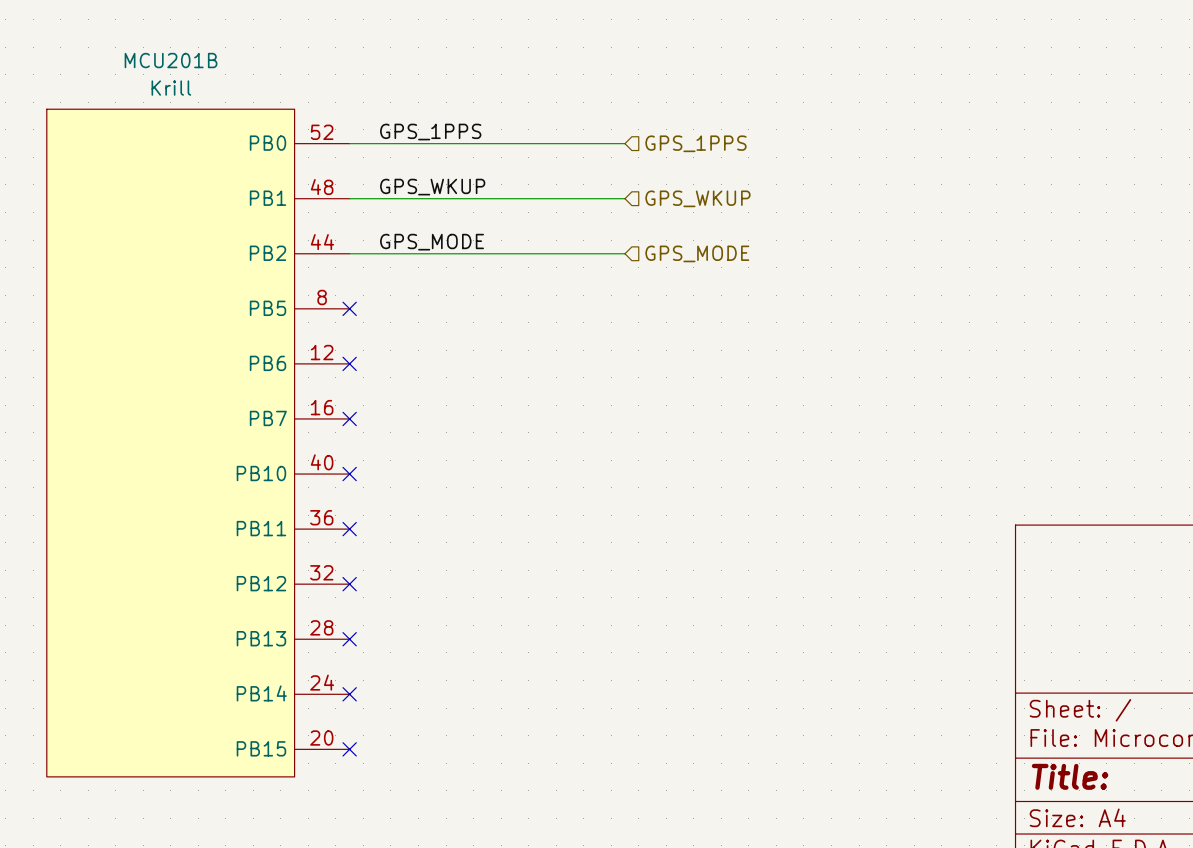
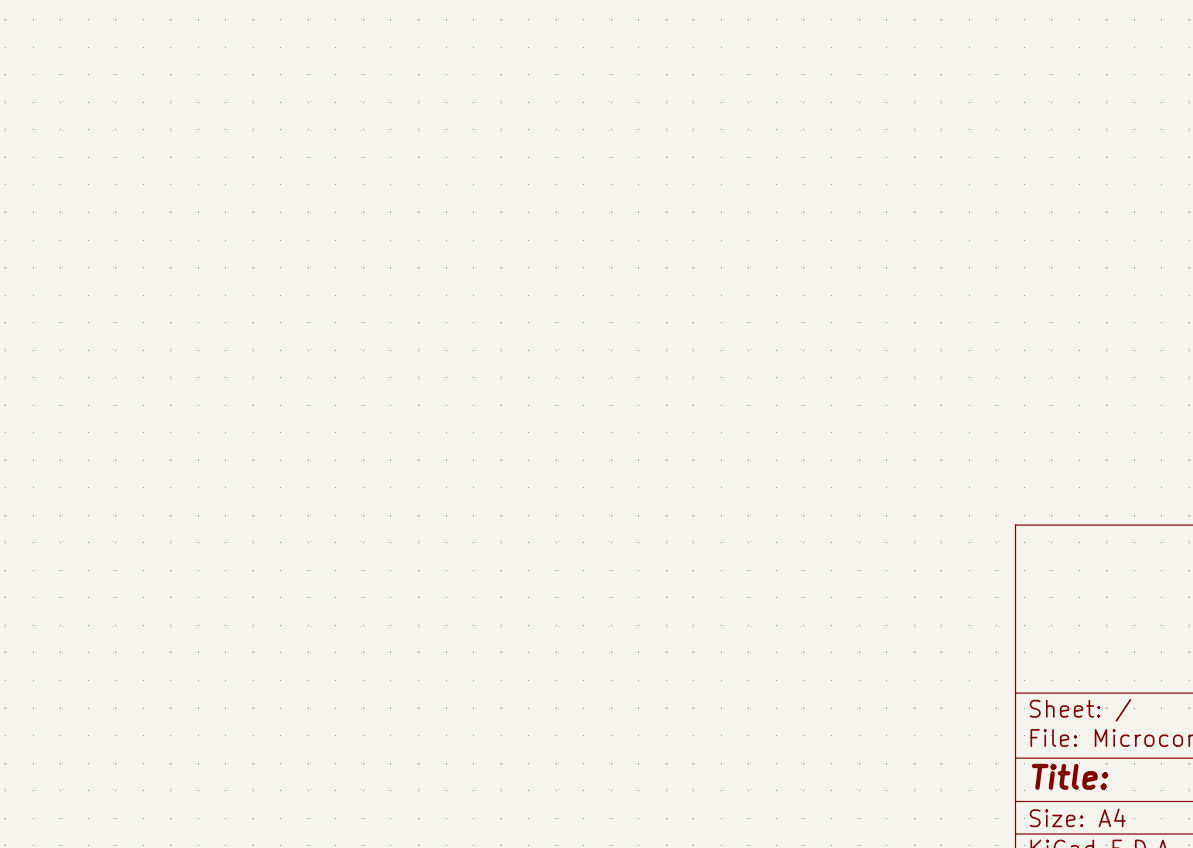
label: GPS_1PPS (430, 132) -> none
wire: (349, 143) (624, 143) -> none
hierarchical label: GPS_1PPS (695, 143) -> none
label: GPS_WKUP (432, 187) -> none
wire: (349, 198) (624, 198) -> none
hierarchical label: GPS_WKUP (697, 198) -> none
label: GPS_MODE (432, 242) -> none
wire: (349, 253) (624, 253) -> none
hierarchical label: GPS_MODE (697, 253) -> none
no-connect mark: (349, 308) -> none
no-connect mark: (349, 363) -> none
no-connect mark: (349, 418) -> none
MCU201B: Krill (198, 443) -> none
no-connect mark: (349, 474) -> none
no-connect mark: (349, 529) -> none
no-connect mark: (349, 584) -> none
no-connect mark: (349, 639) -> none
no-connect mark: (349, 694) -> none
no-connect mark: (349, 749) -> none

